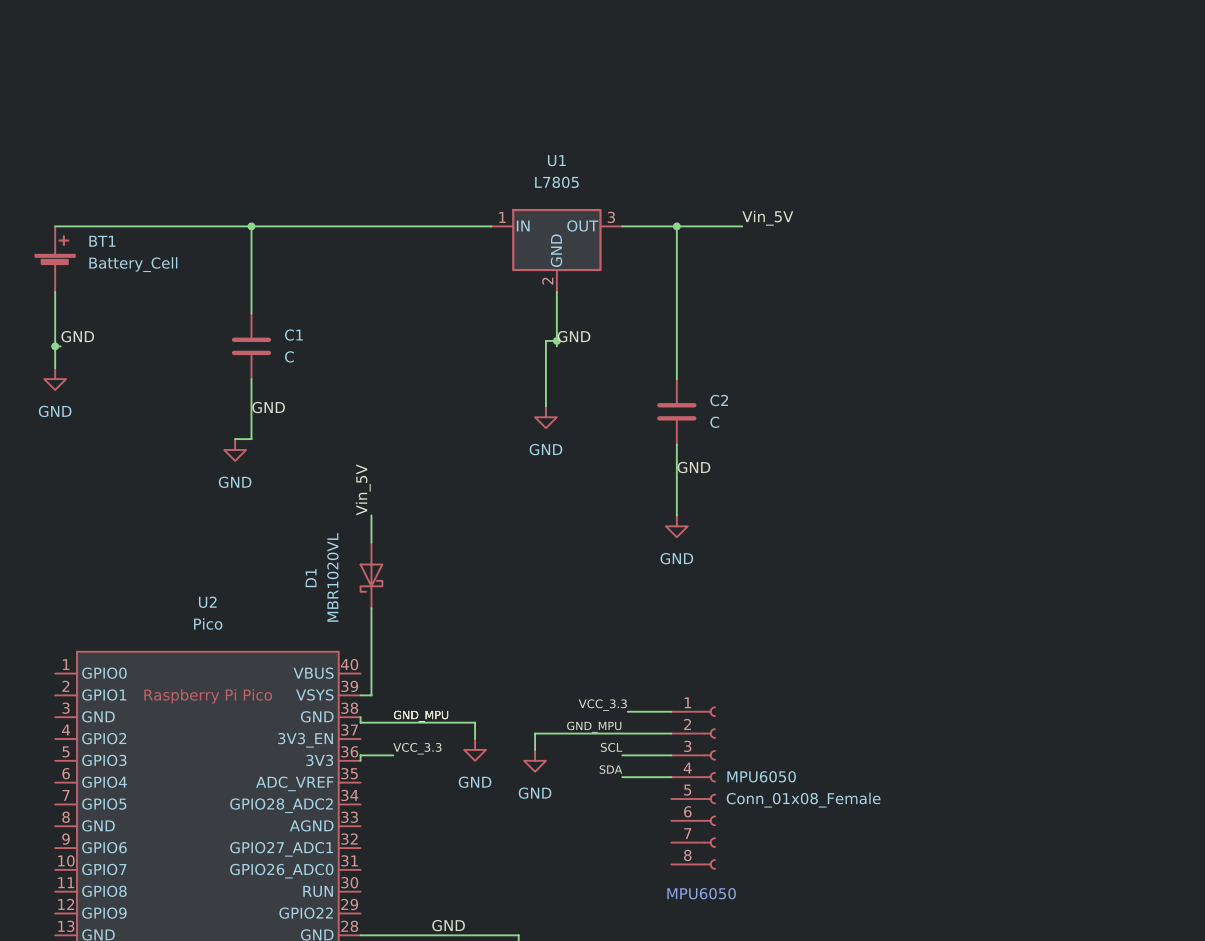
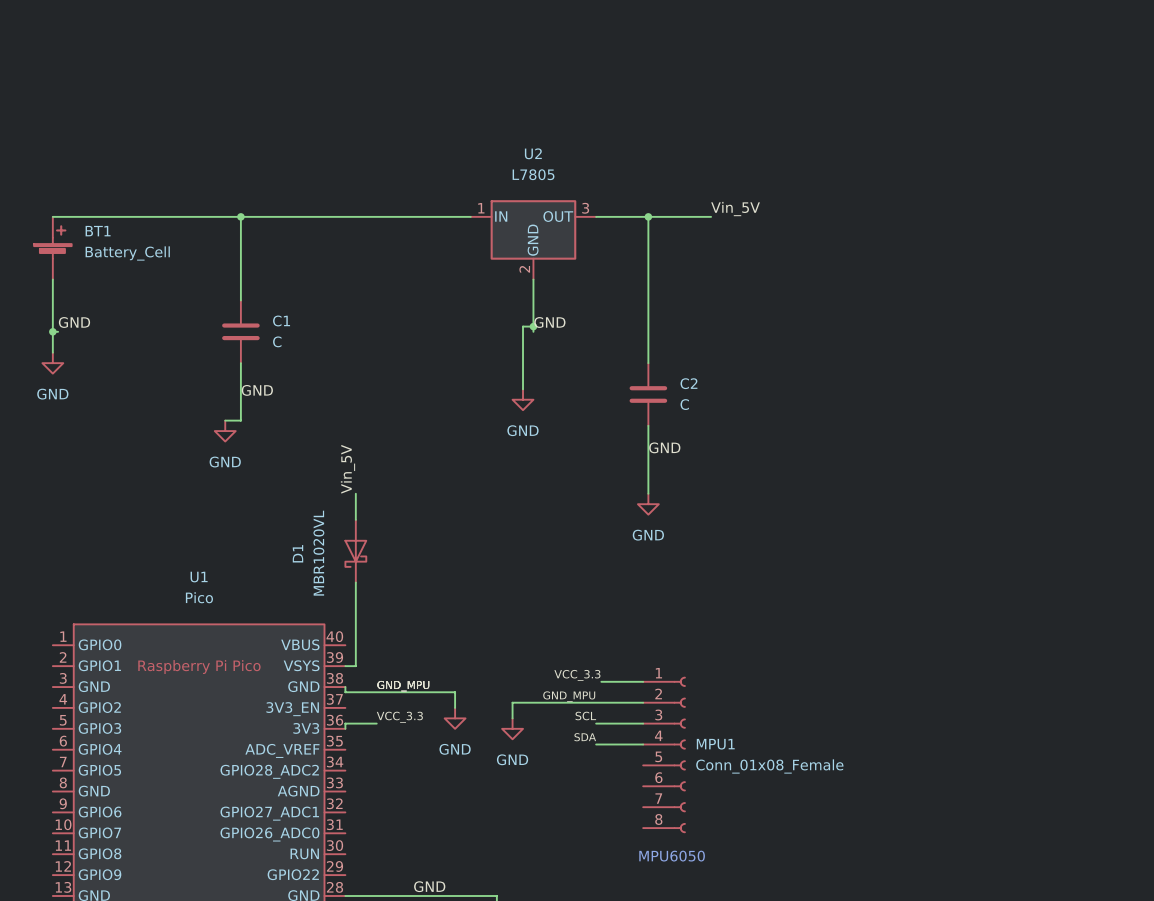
U1 name: U1 (556, 160) -> U2 (533, 153)
U2 name: U2 (207, 602) -> U1 (199, 577)
MPU6050 name: MPU6050 (761, 776) -> MPU1 (715, 744)

